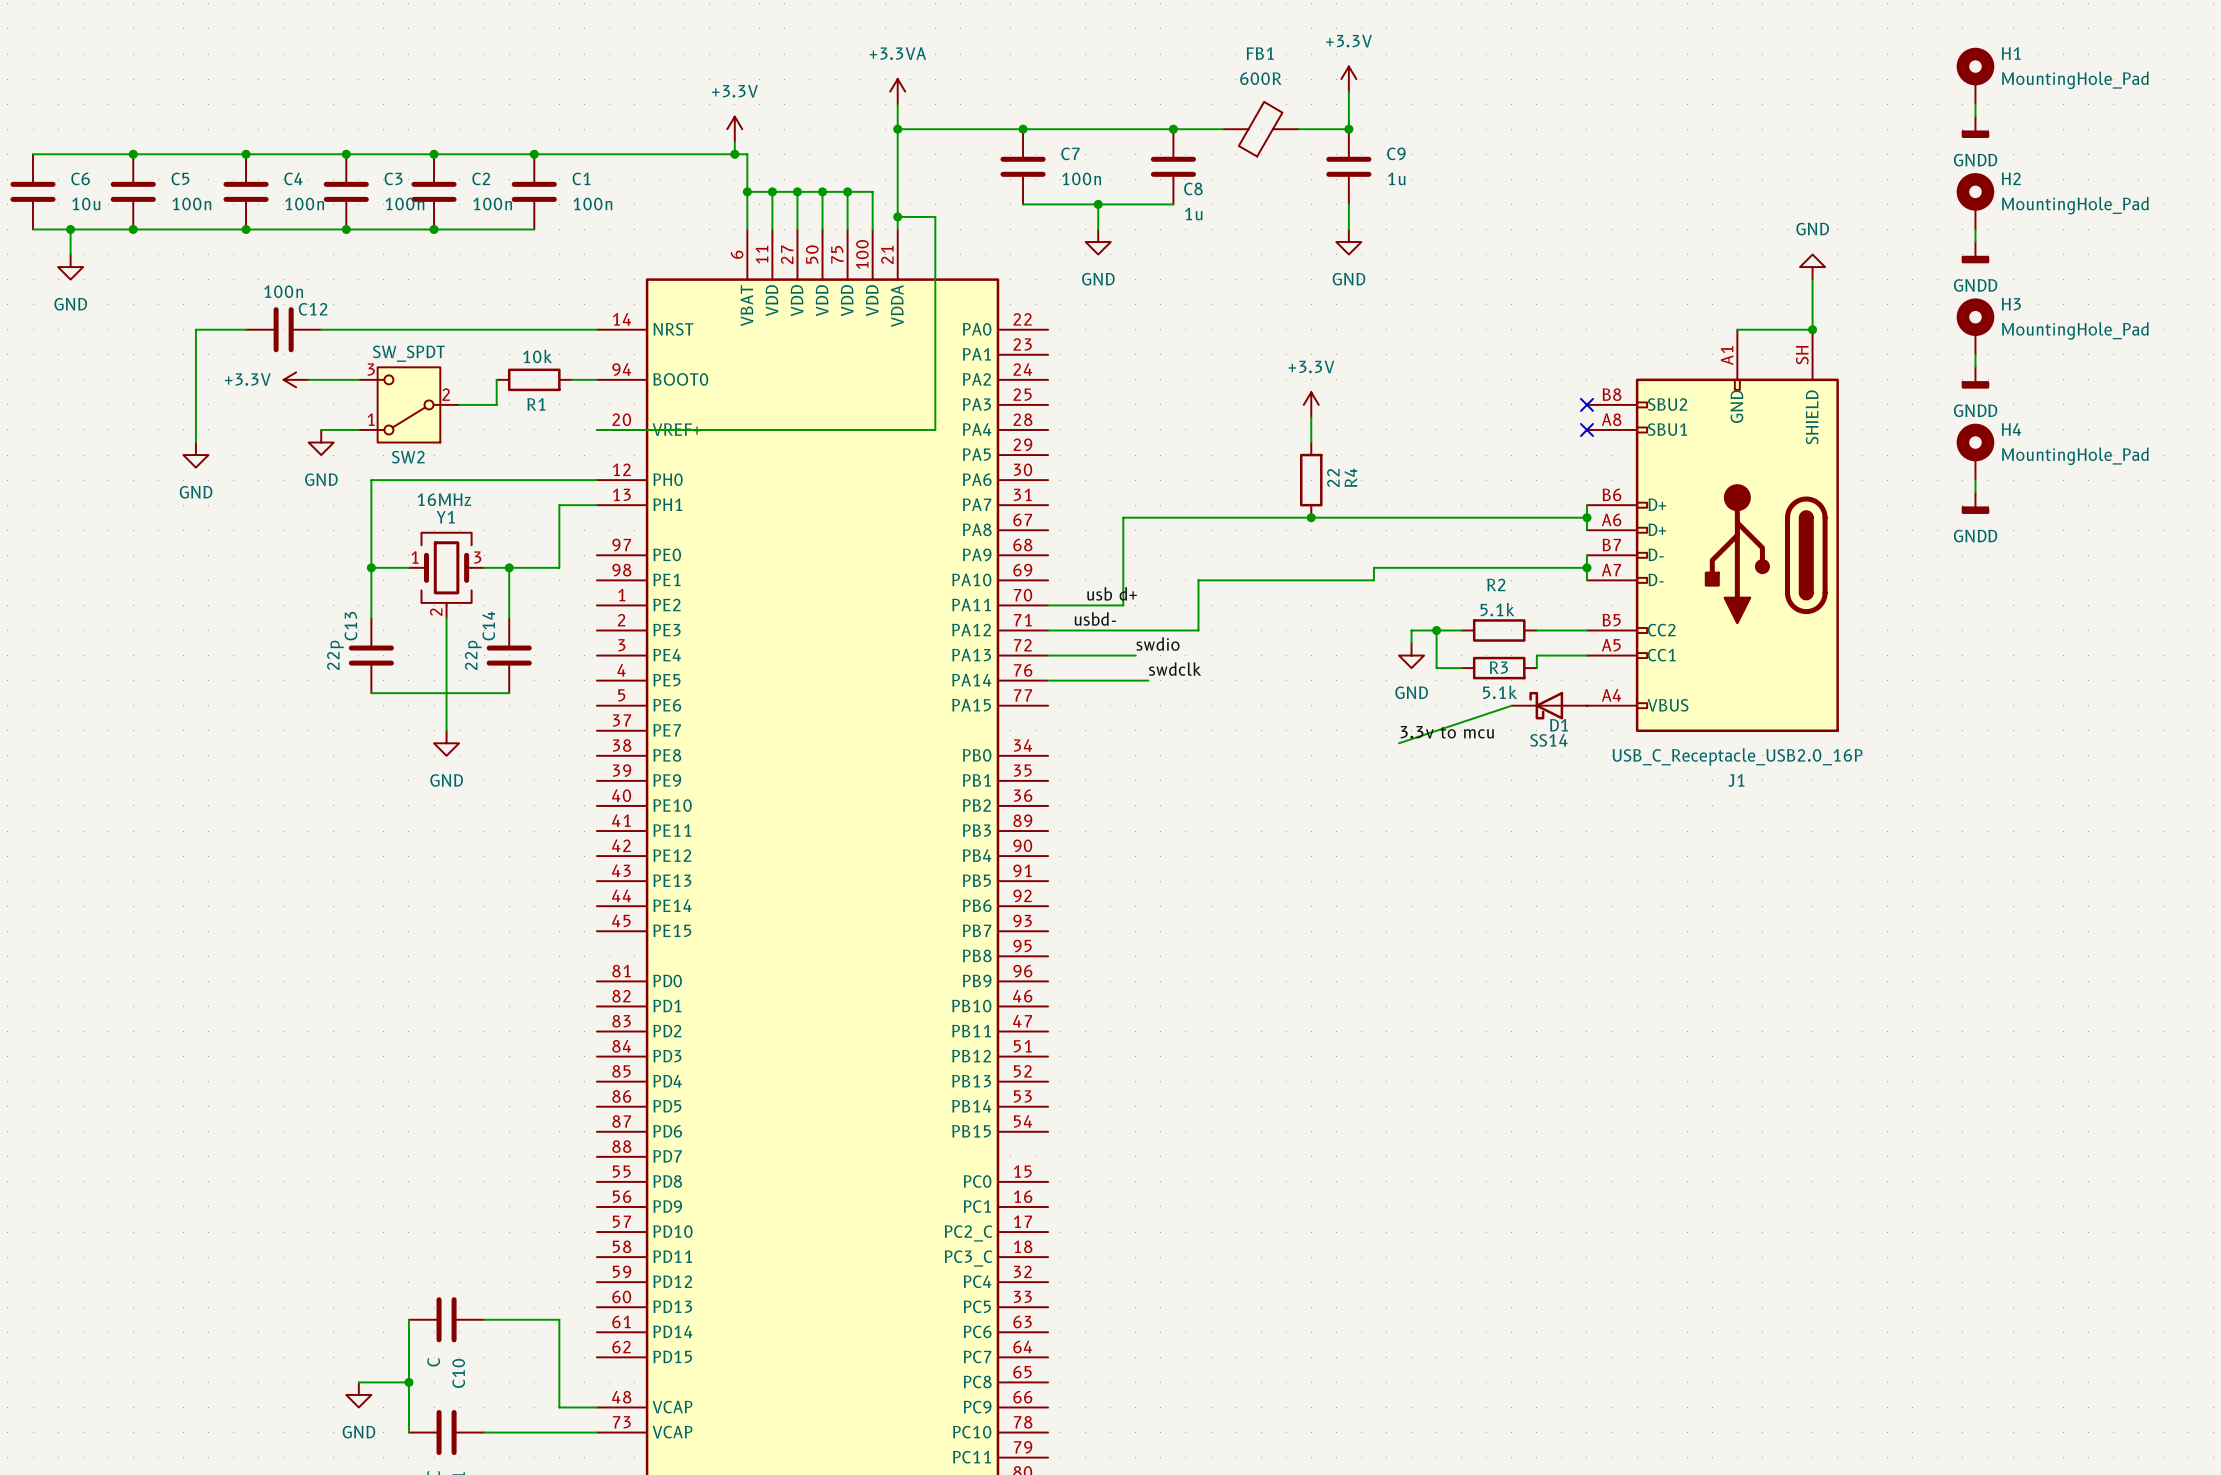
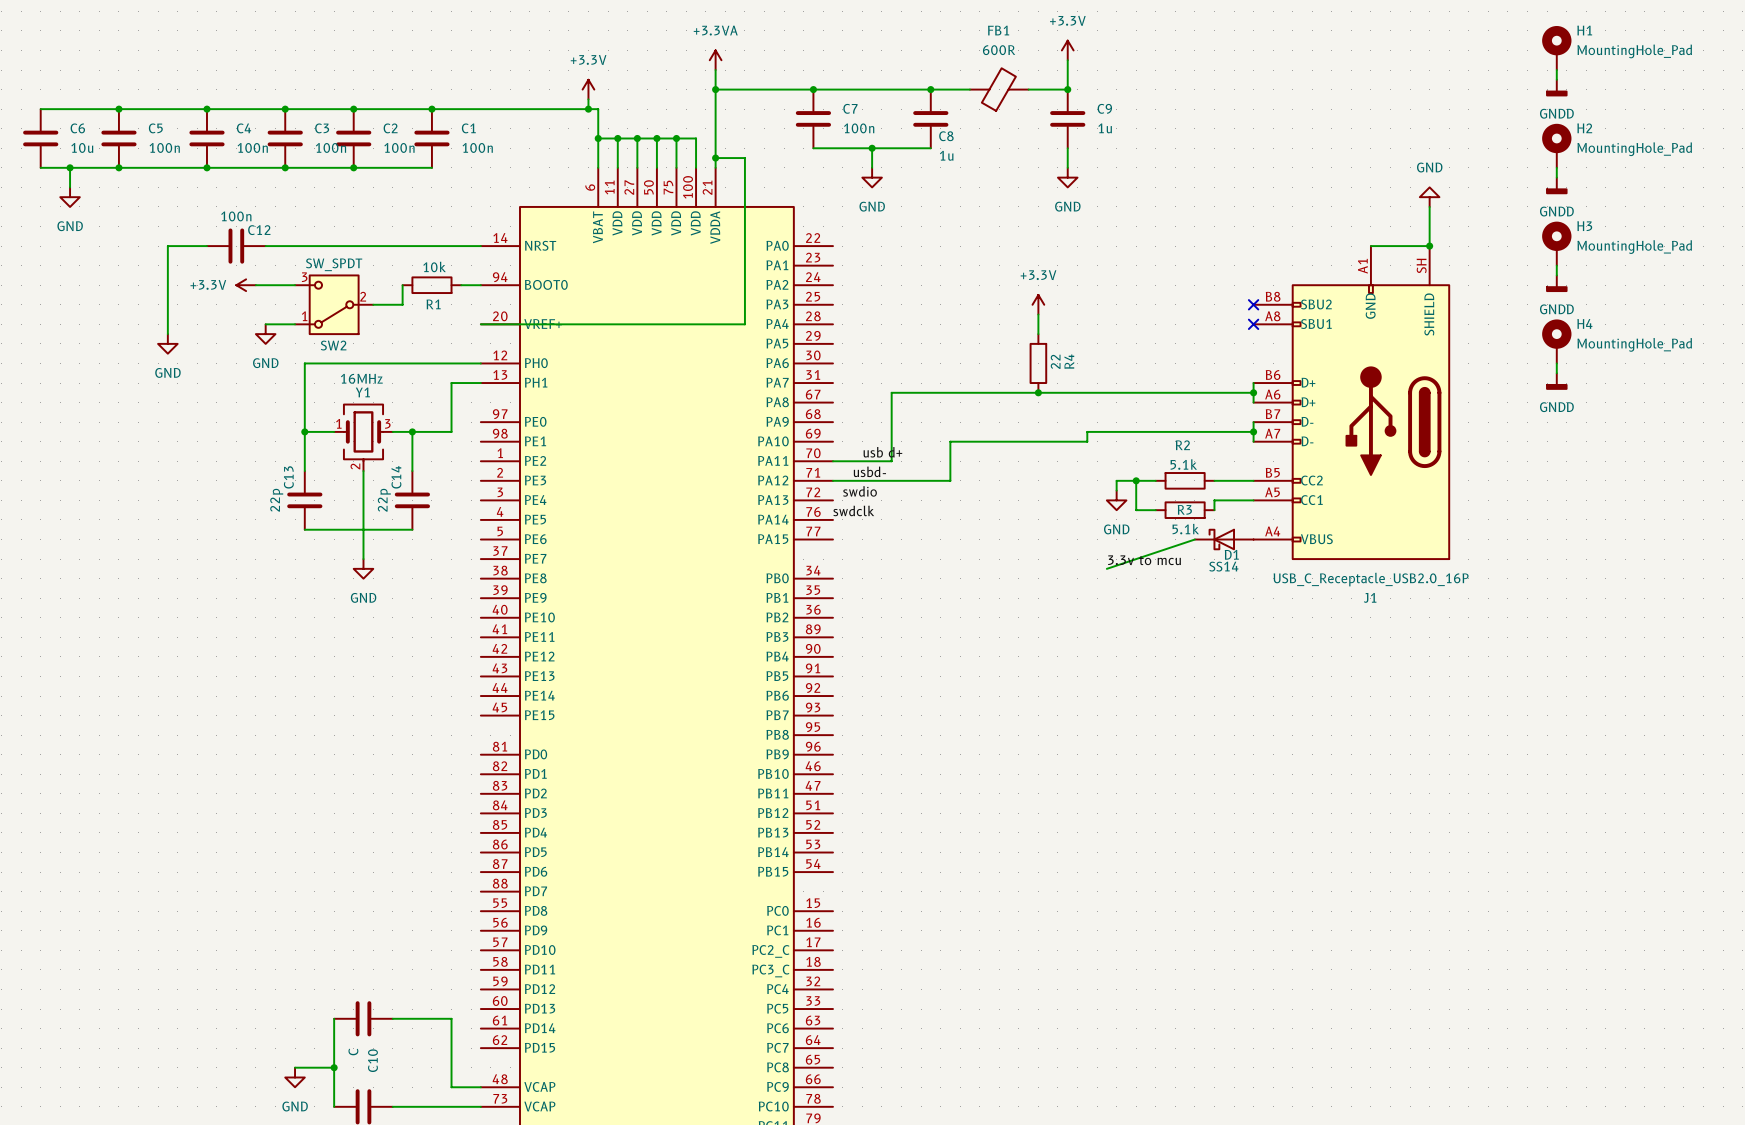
label position: swdio (1157, 644) -> swdio (860, 491)
wire: (1048, 655) (1135, 655) -> none
label position: swdclk (1175, 669) -> swdclk (853, 510)
wire: (1048, 680) (1148, 680) -> none

